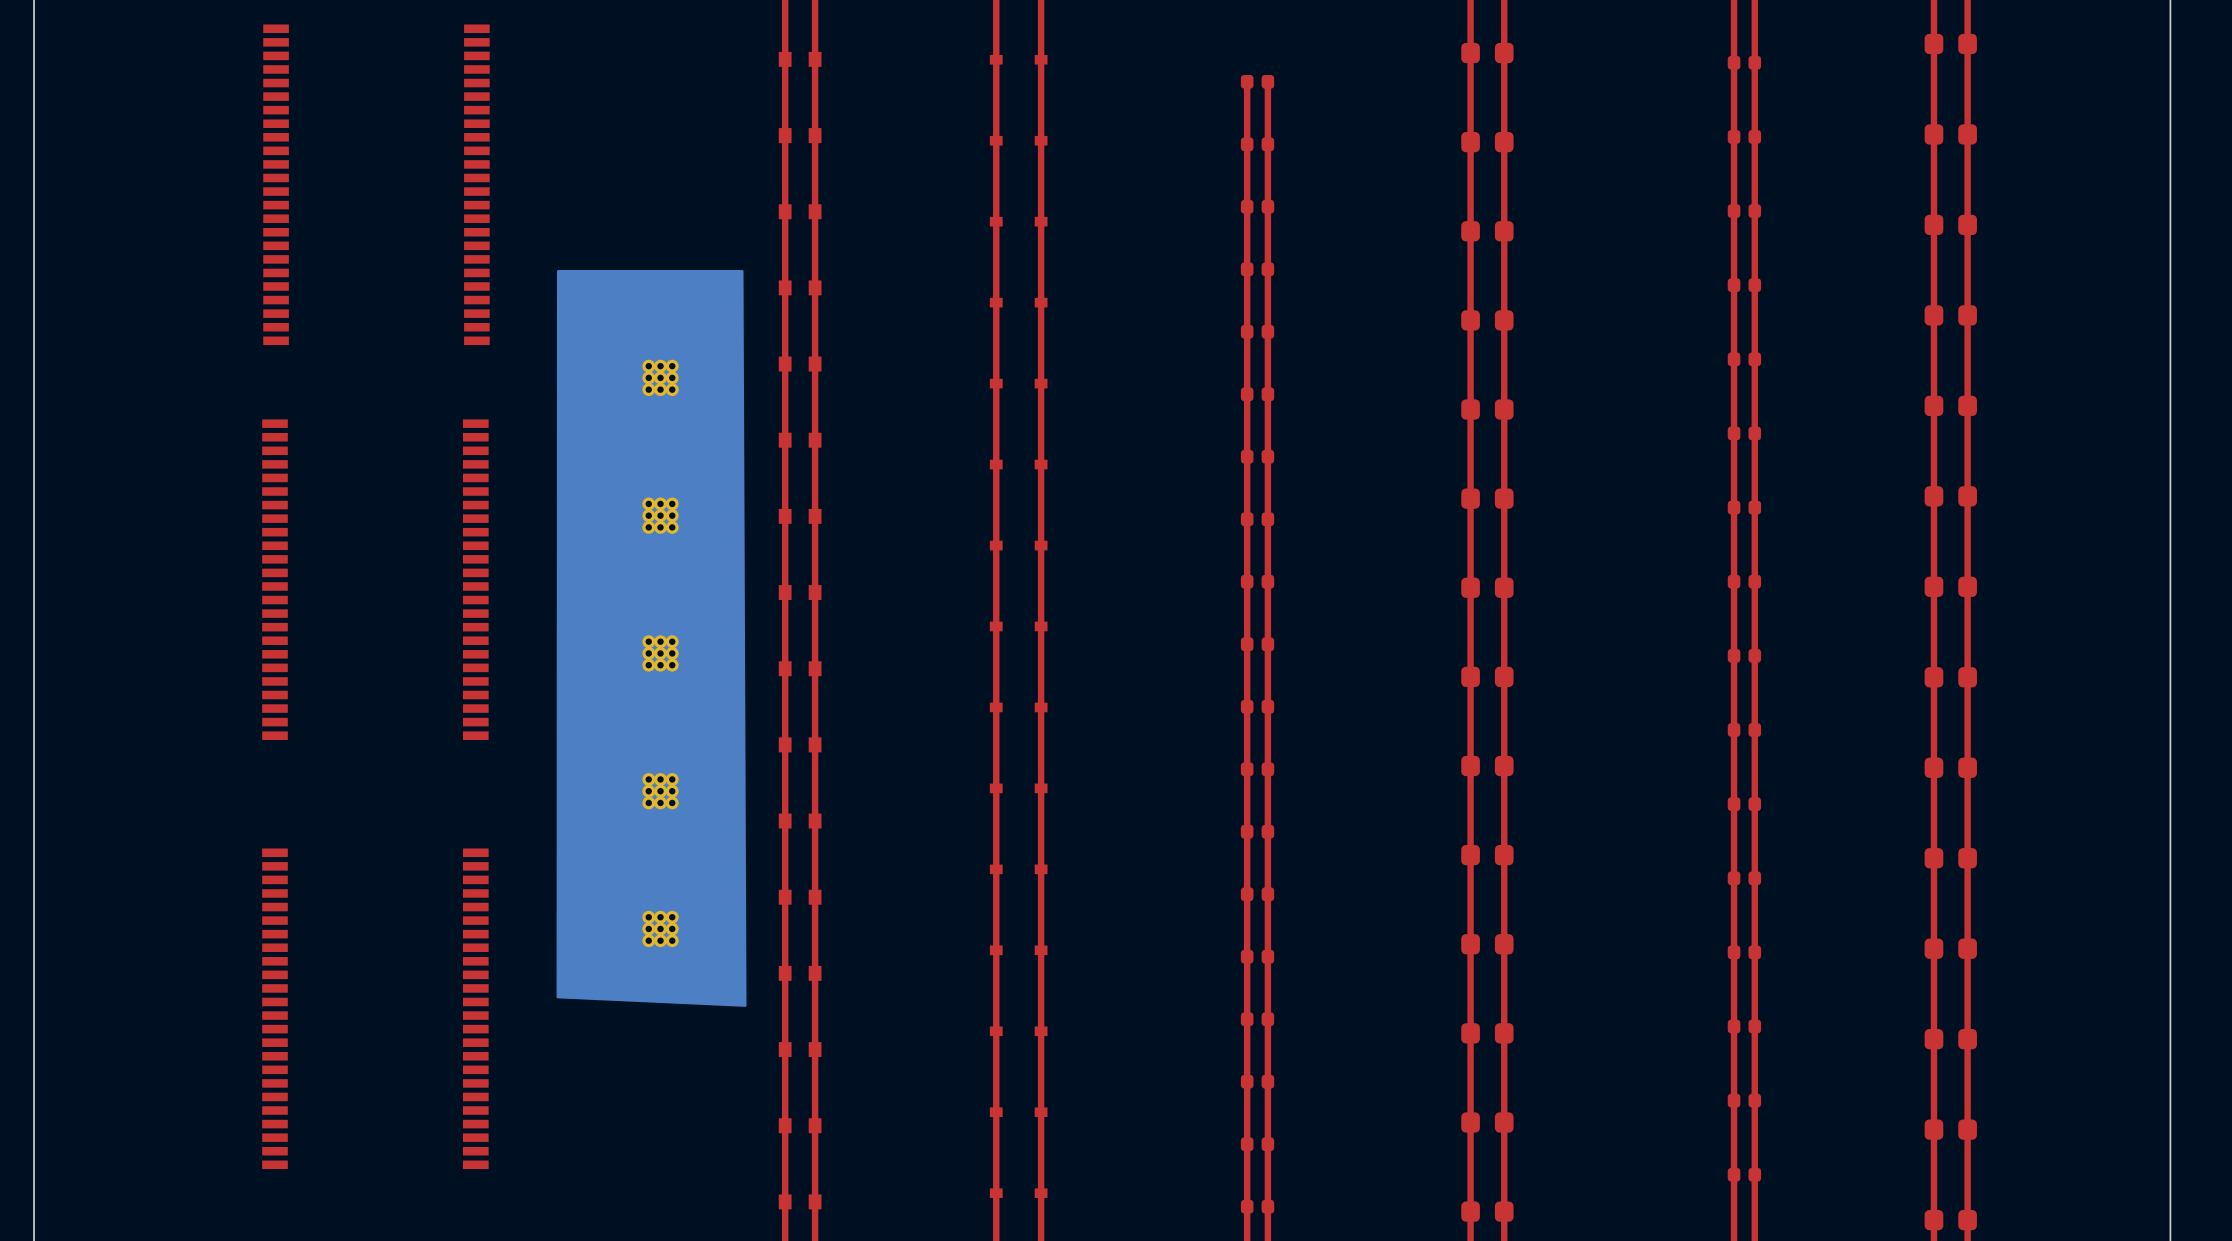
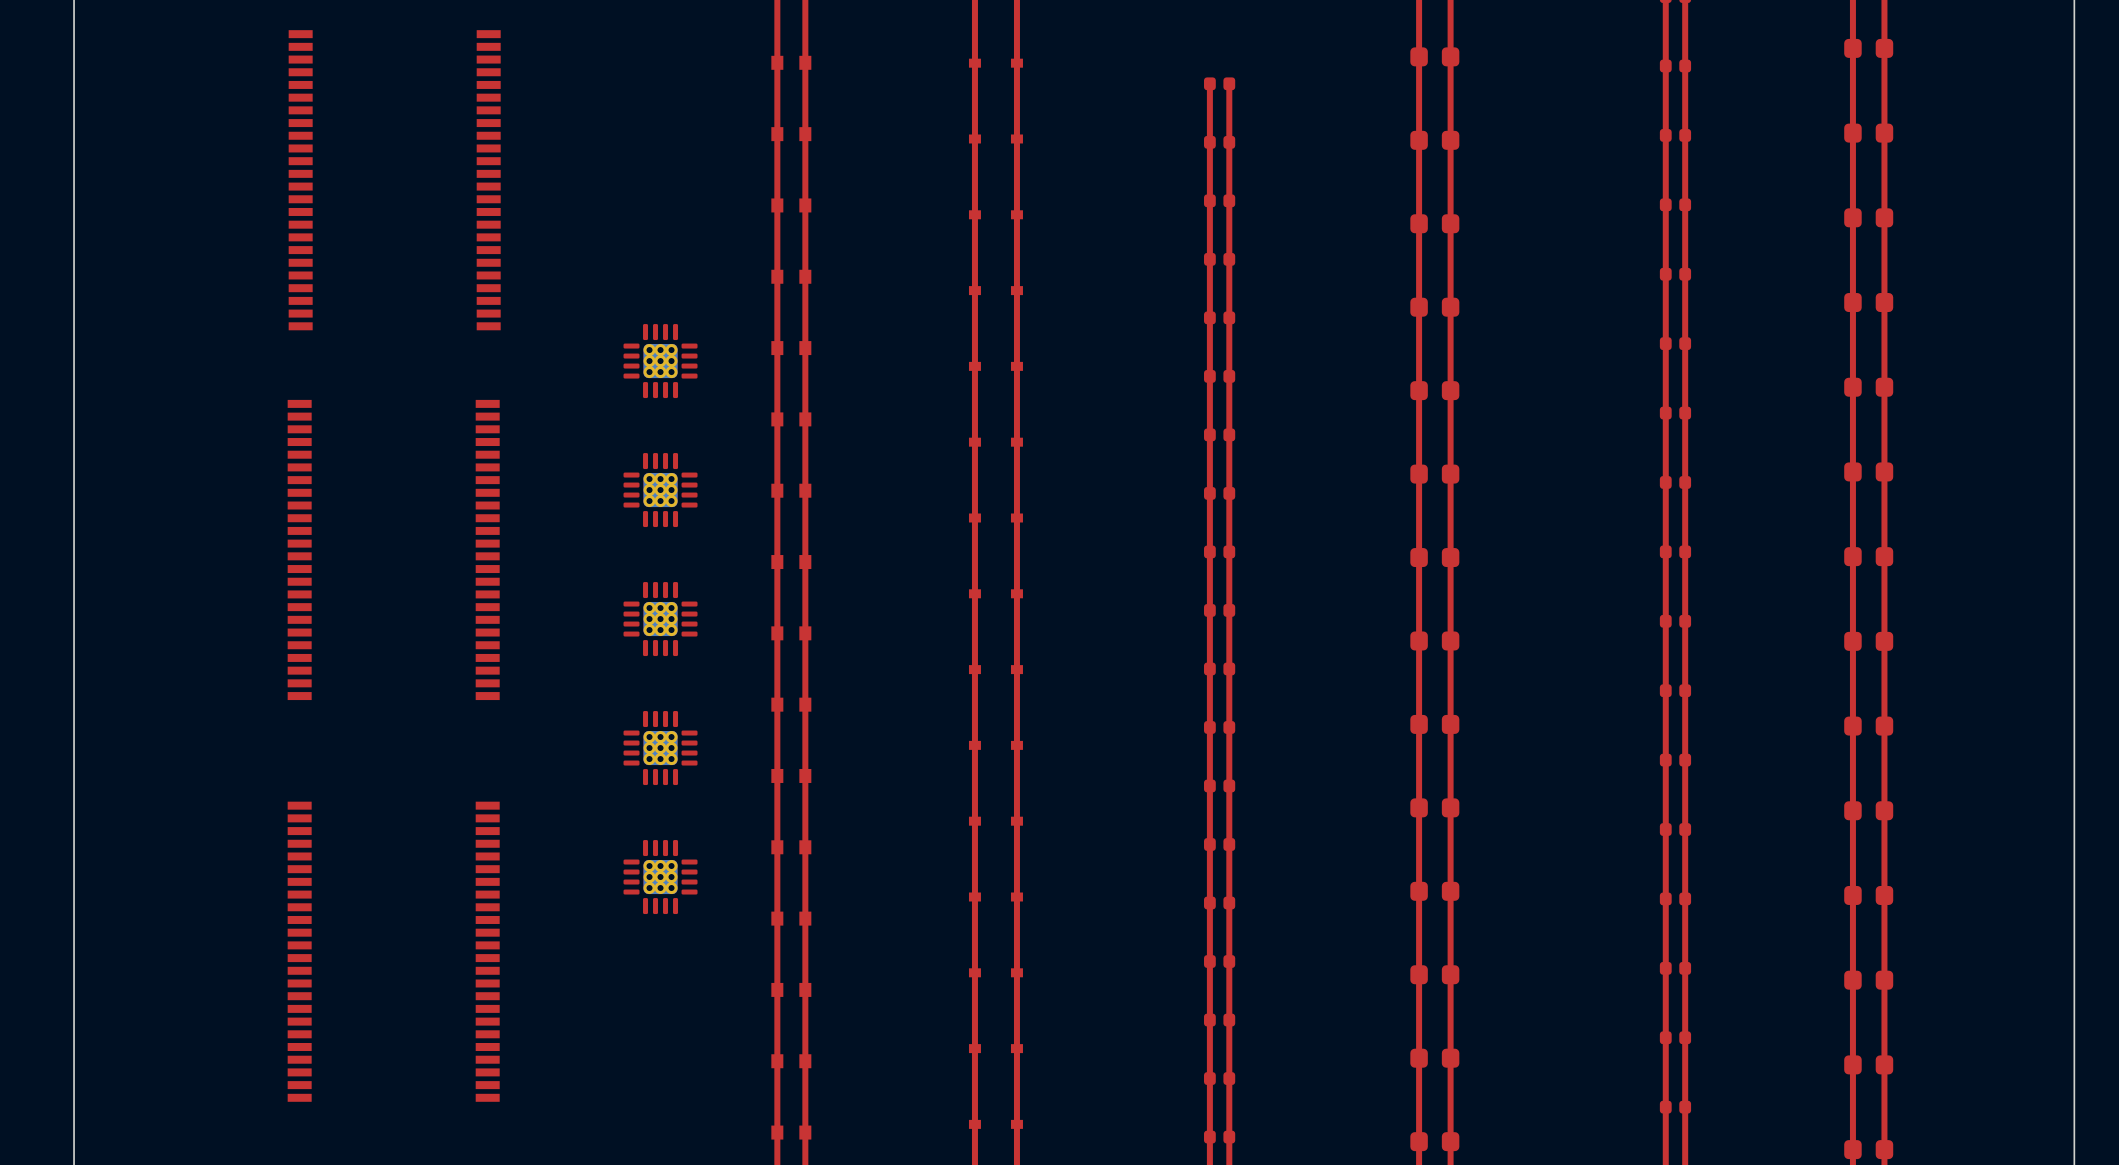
drawing: [556, 270, 747, 1007] -> none

